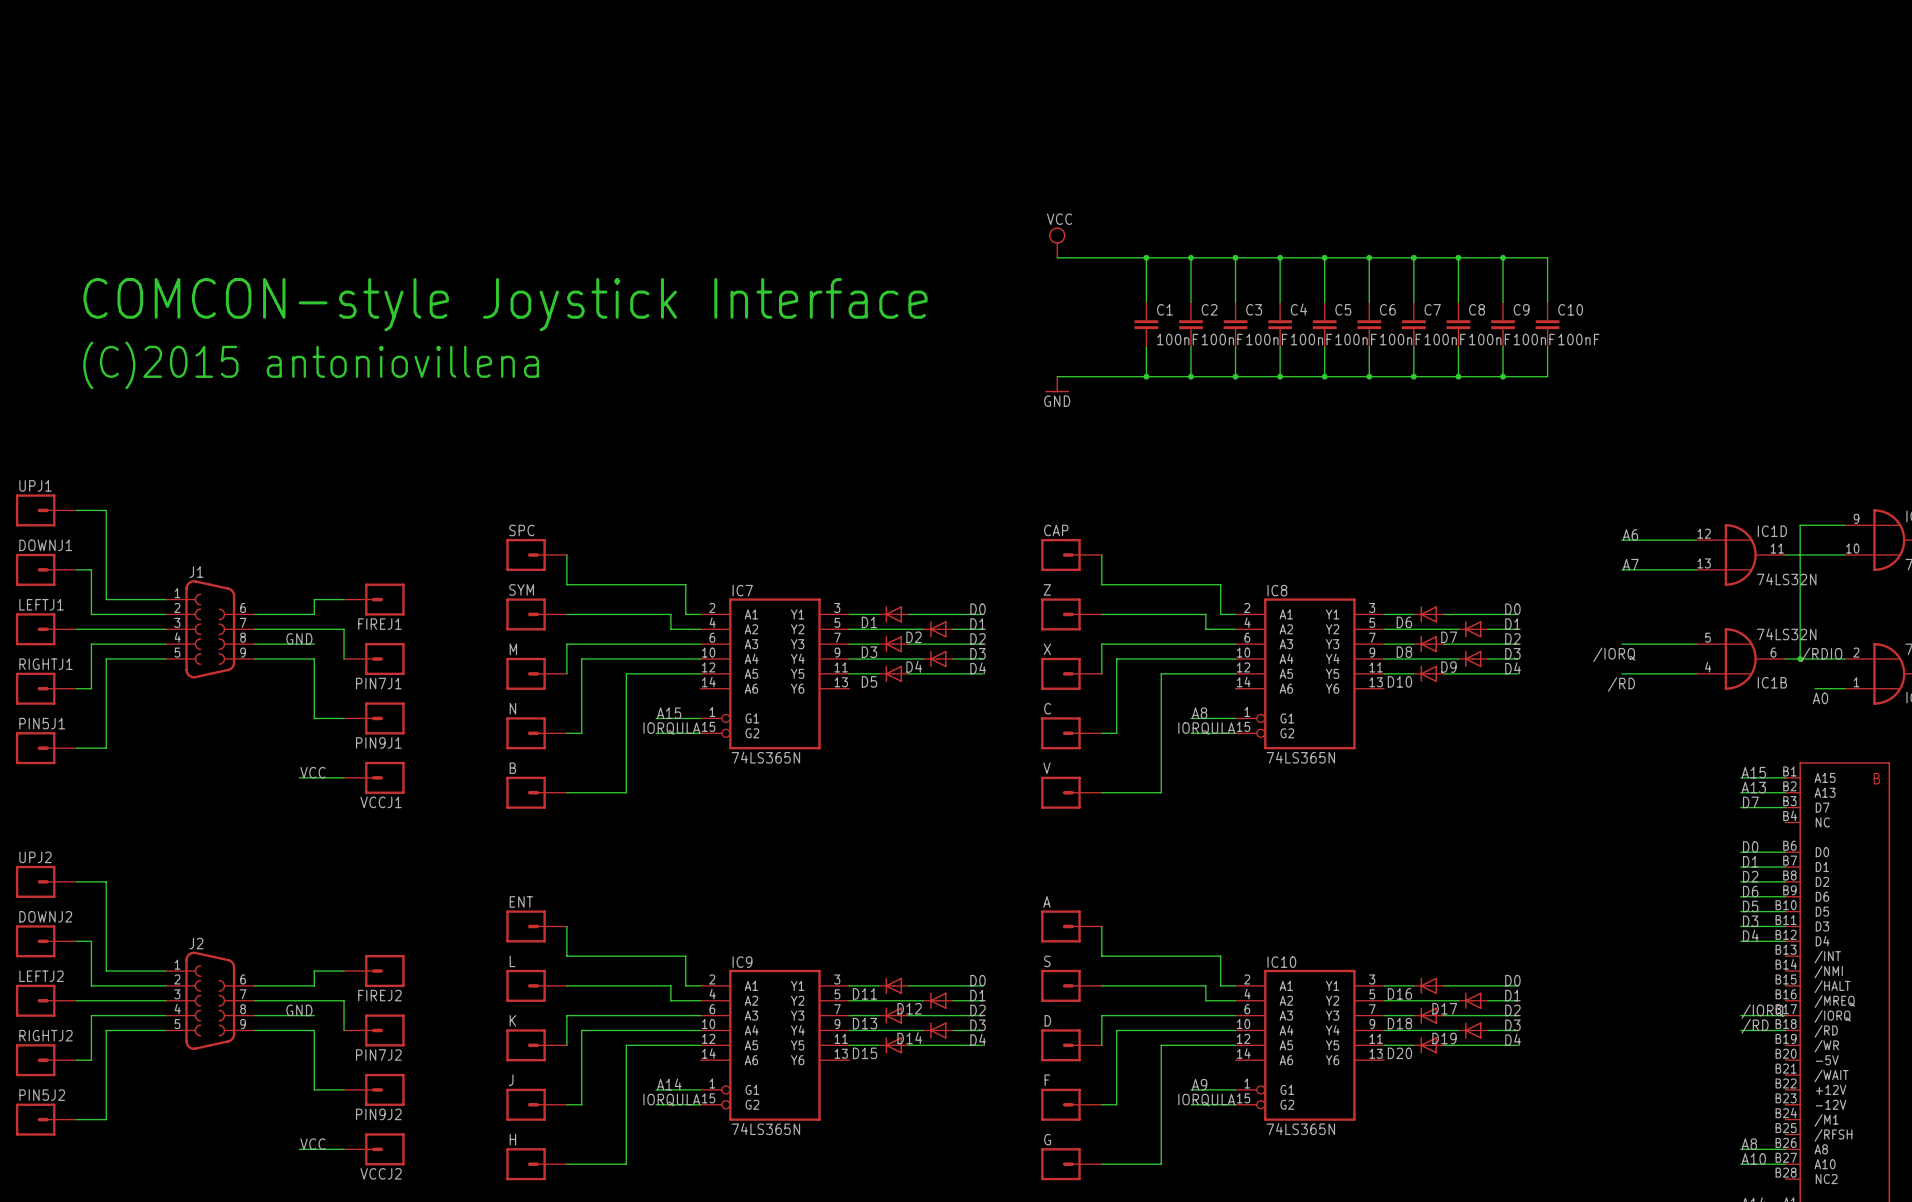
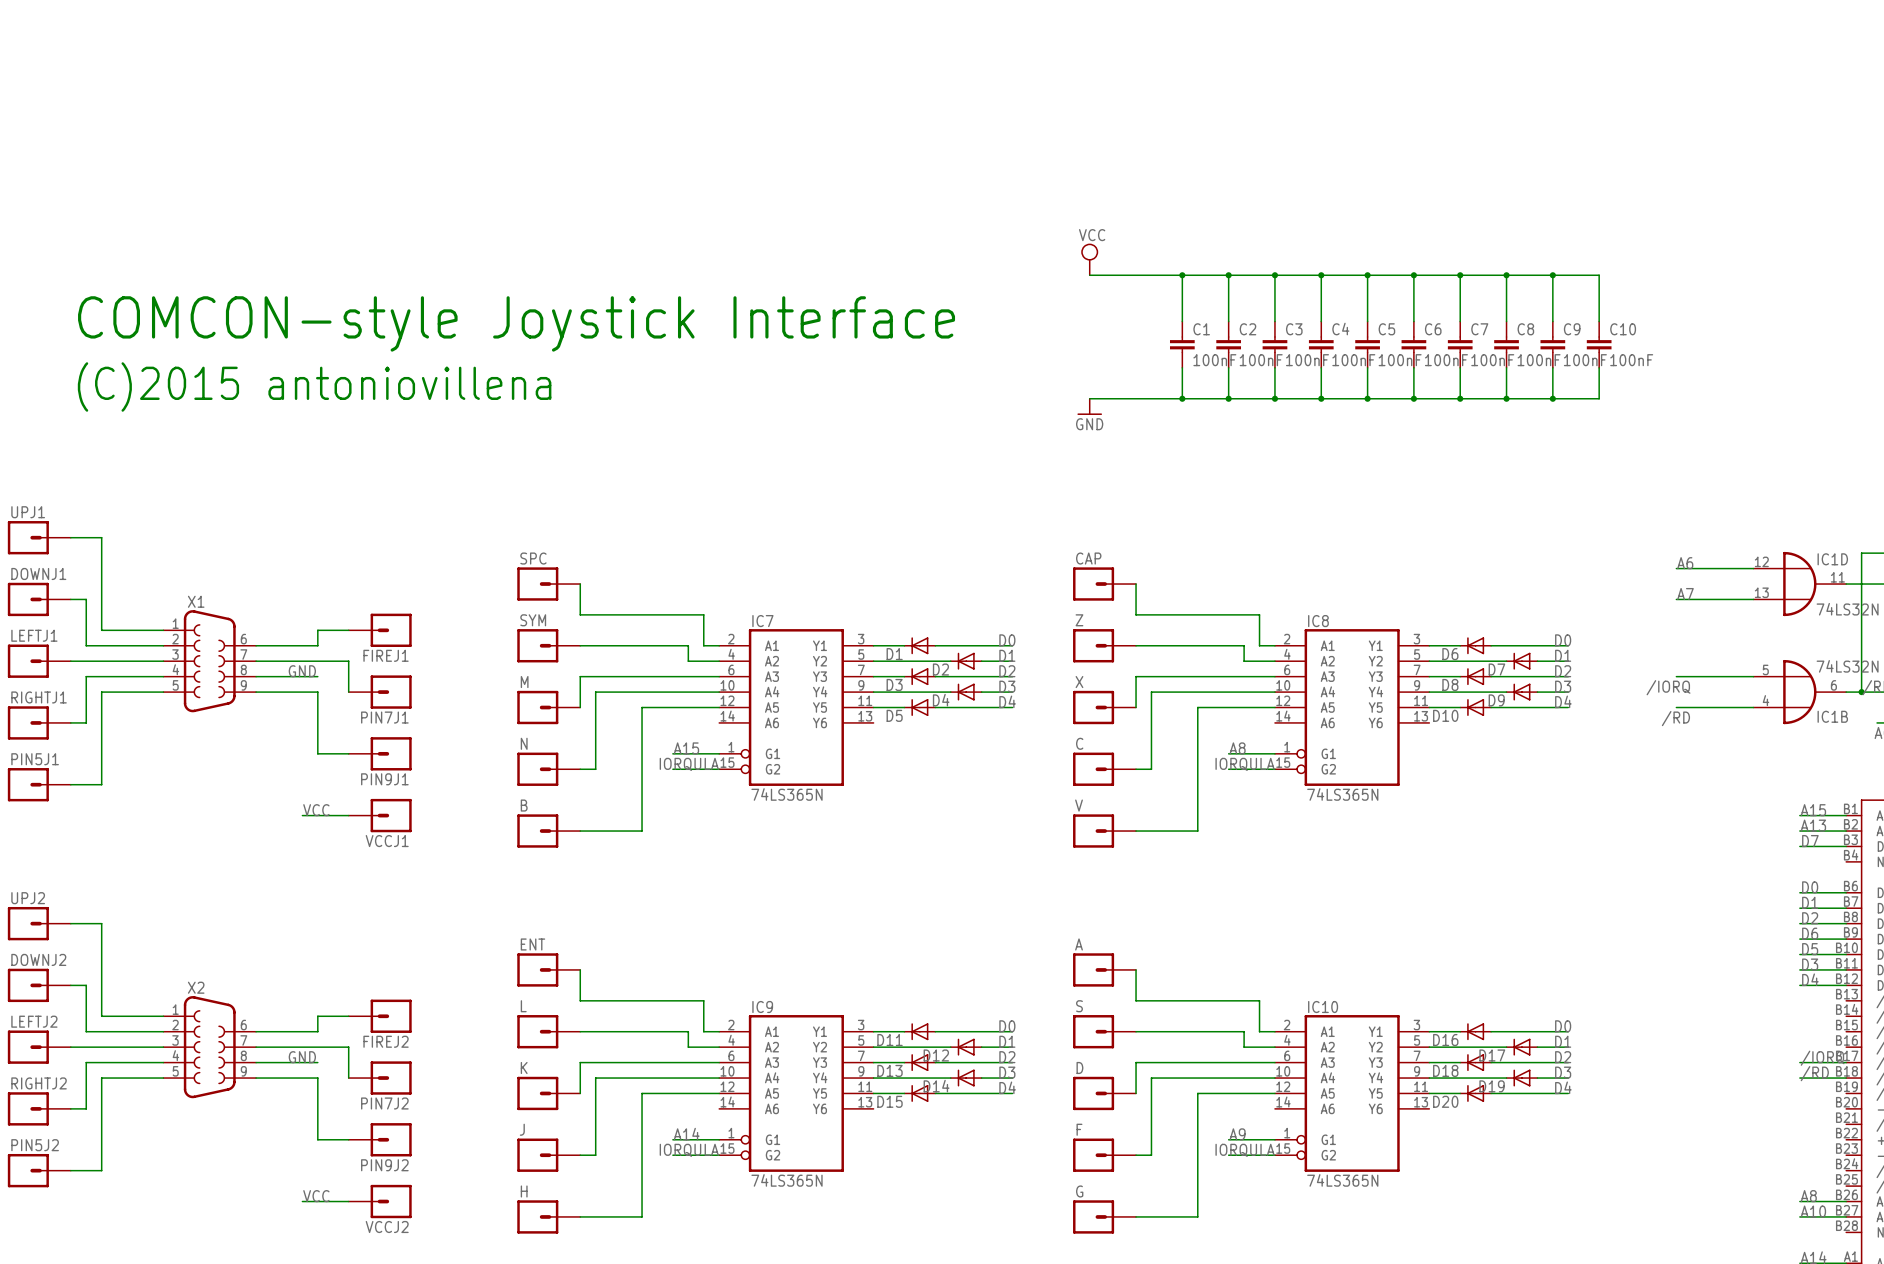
J1: (210, 629) -> none
X1: none -> (209, 661)
J2: (210, 1000) -> none
X2: none -> (209, 1047)

